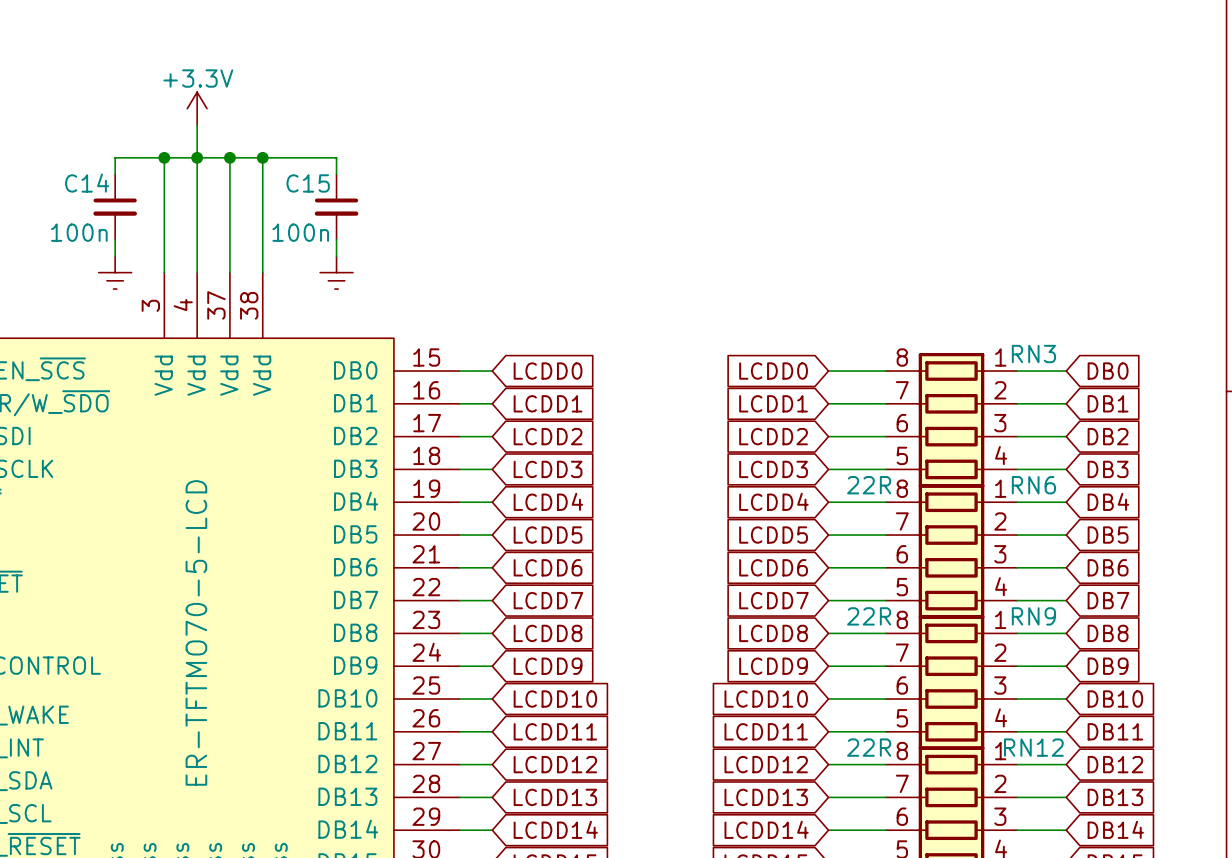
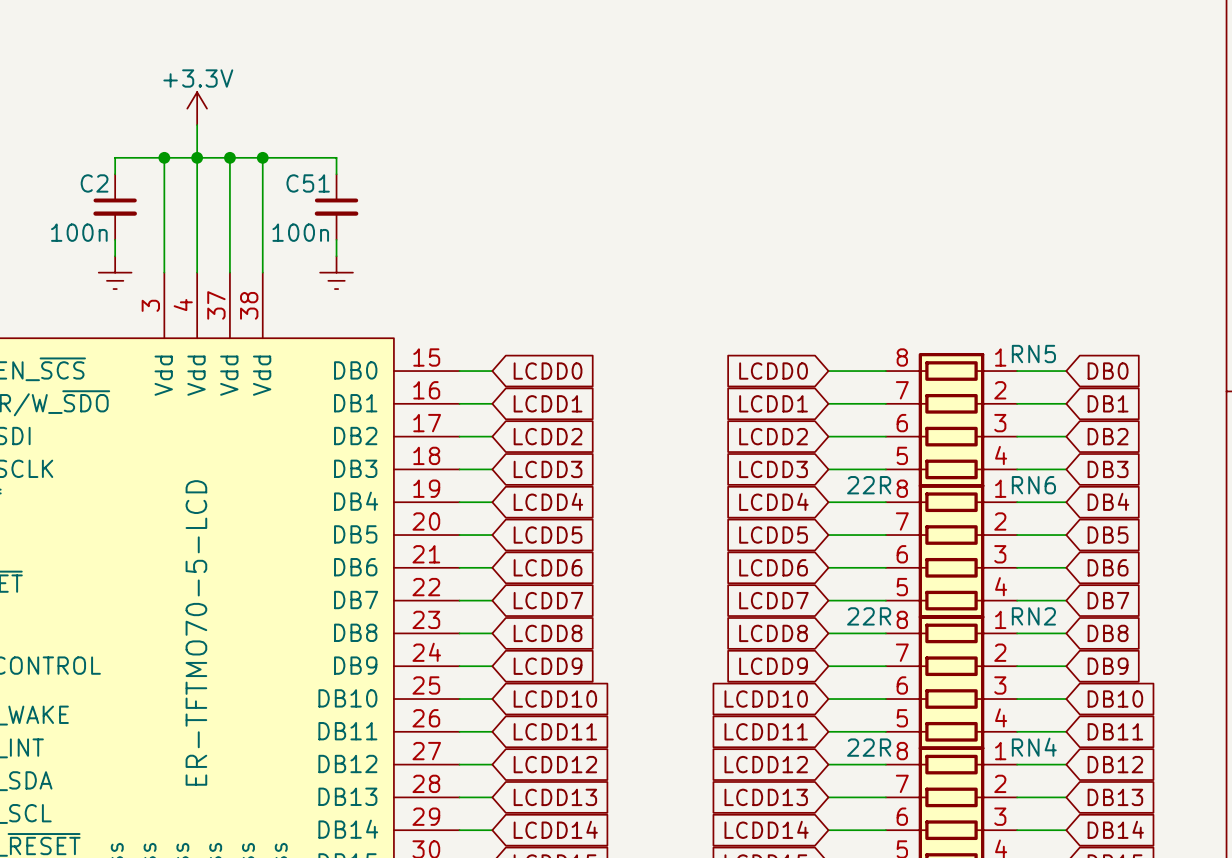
C14 name: C14 (87, 183) -> C2 (94, 183)
C15 name: C15 (308, 183) -> C51 (308, 183)
RN3 name: RN3 (1033, 354) -> RN5 (1033, 354)
RN9 name: RN9 (1033, 616) -> RN2 (1033, 616)
RN12 name: RN12 (1033, 747) -> RN4 (1034, 747)

